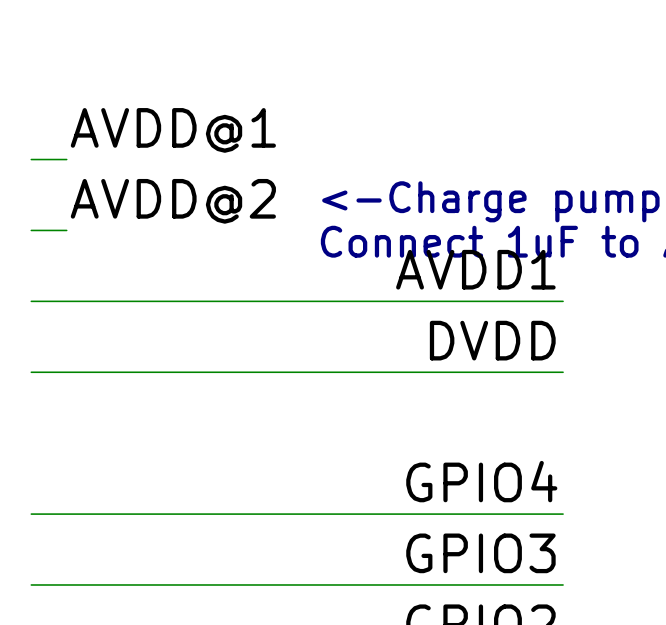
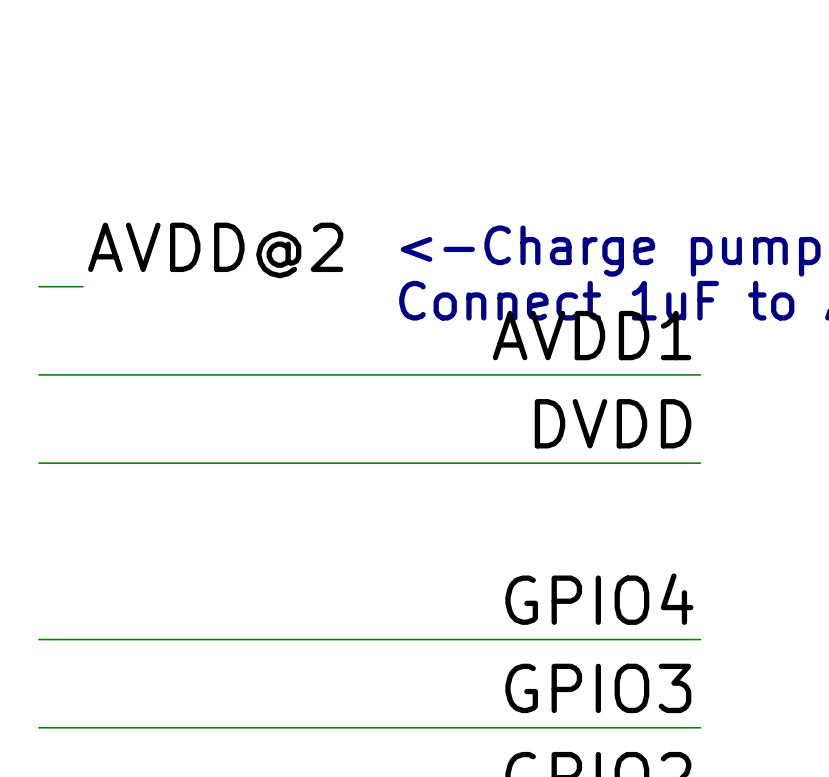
label: AVDD@1 (173, 130) -> none
wire: (31, 159) (66, 159) -> none

